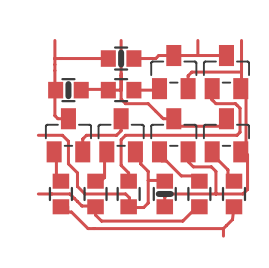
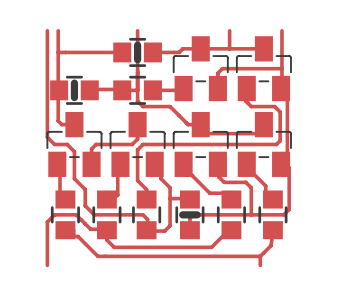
track: (38, 135) (51, 135) -> (47, 30) (47, 137) (54, 144)
track: (38, 193) (51, 193) -> (47, 265) (47, 222) (54, 214)

